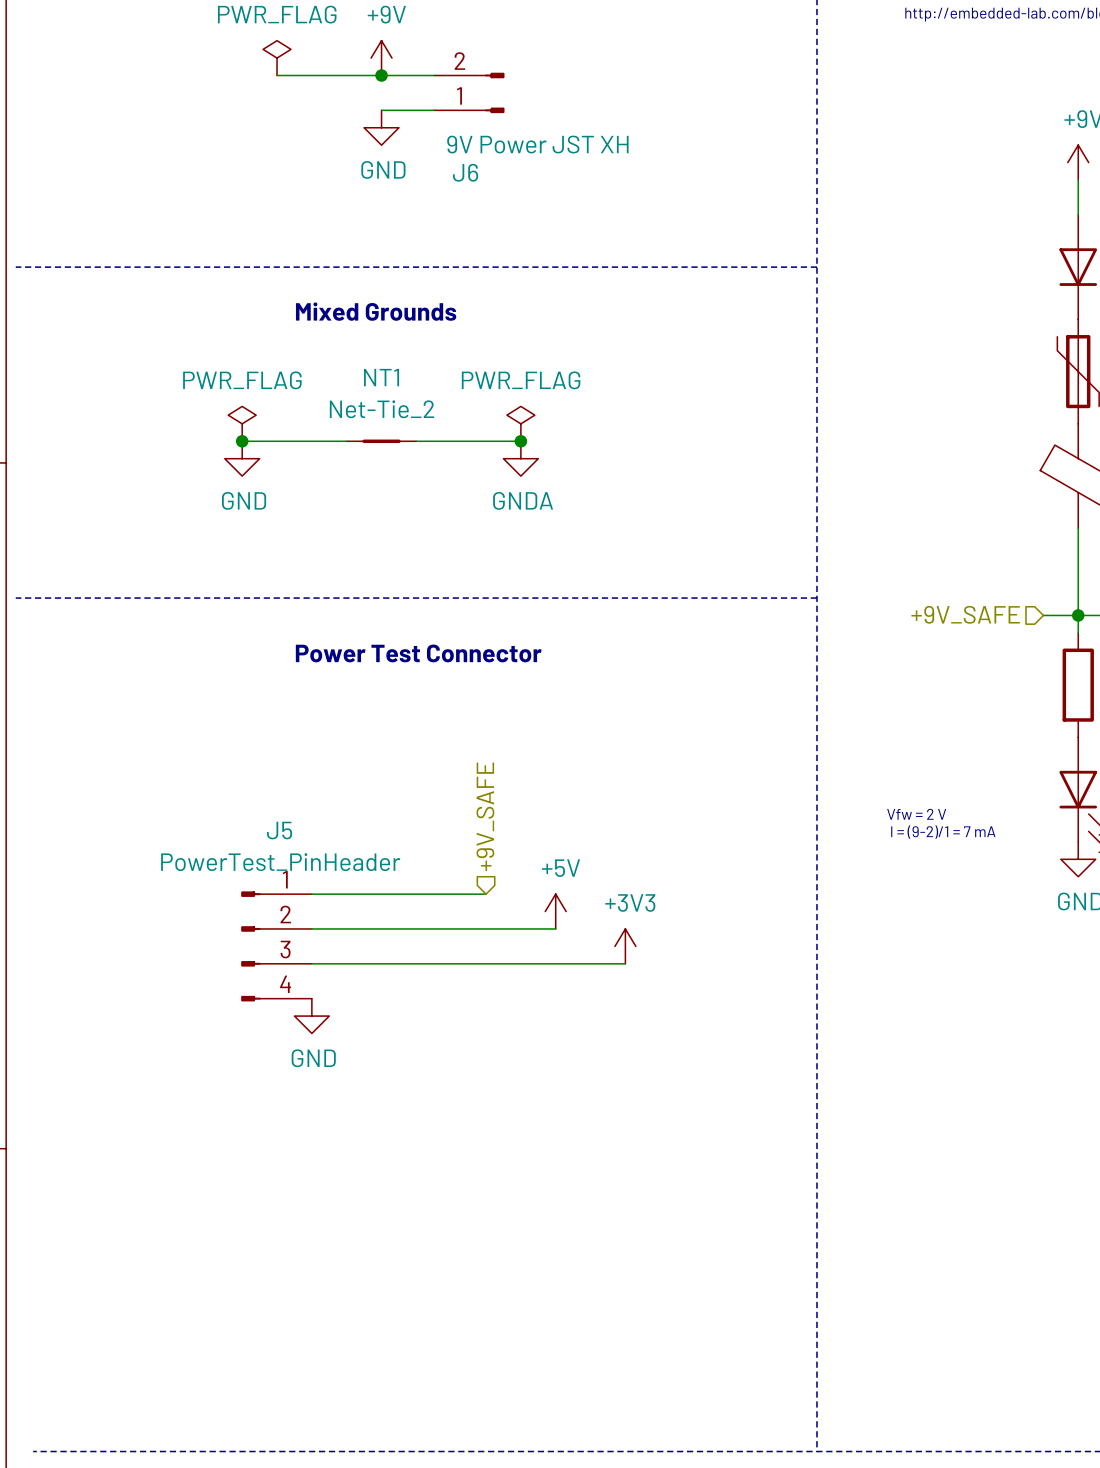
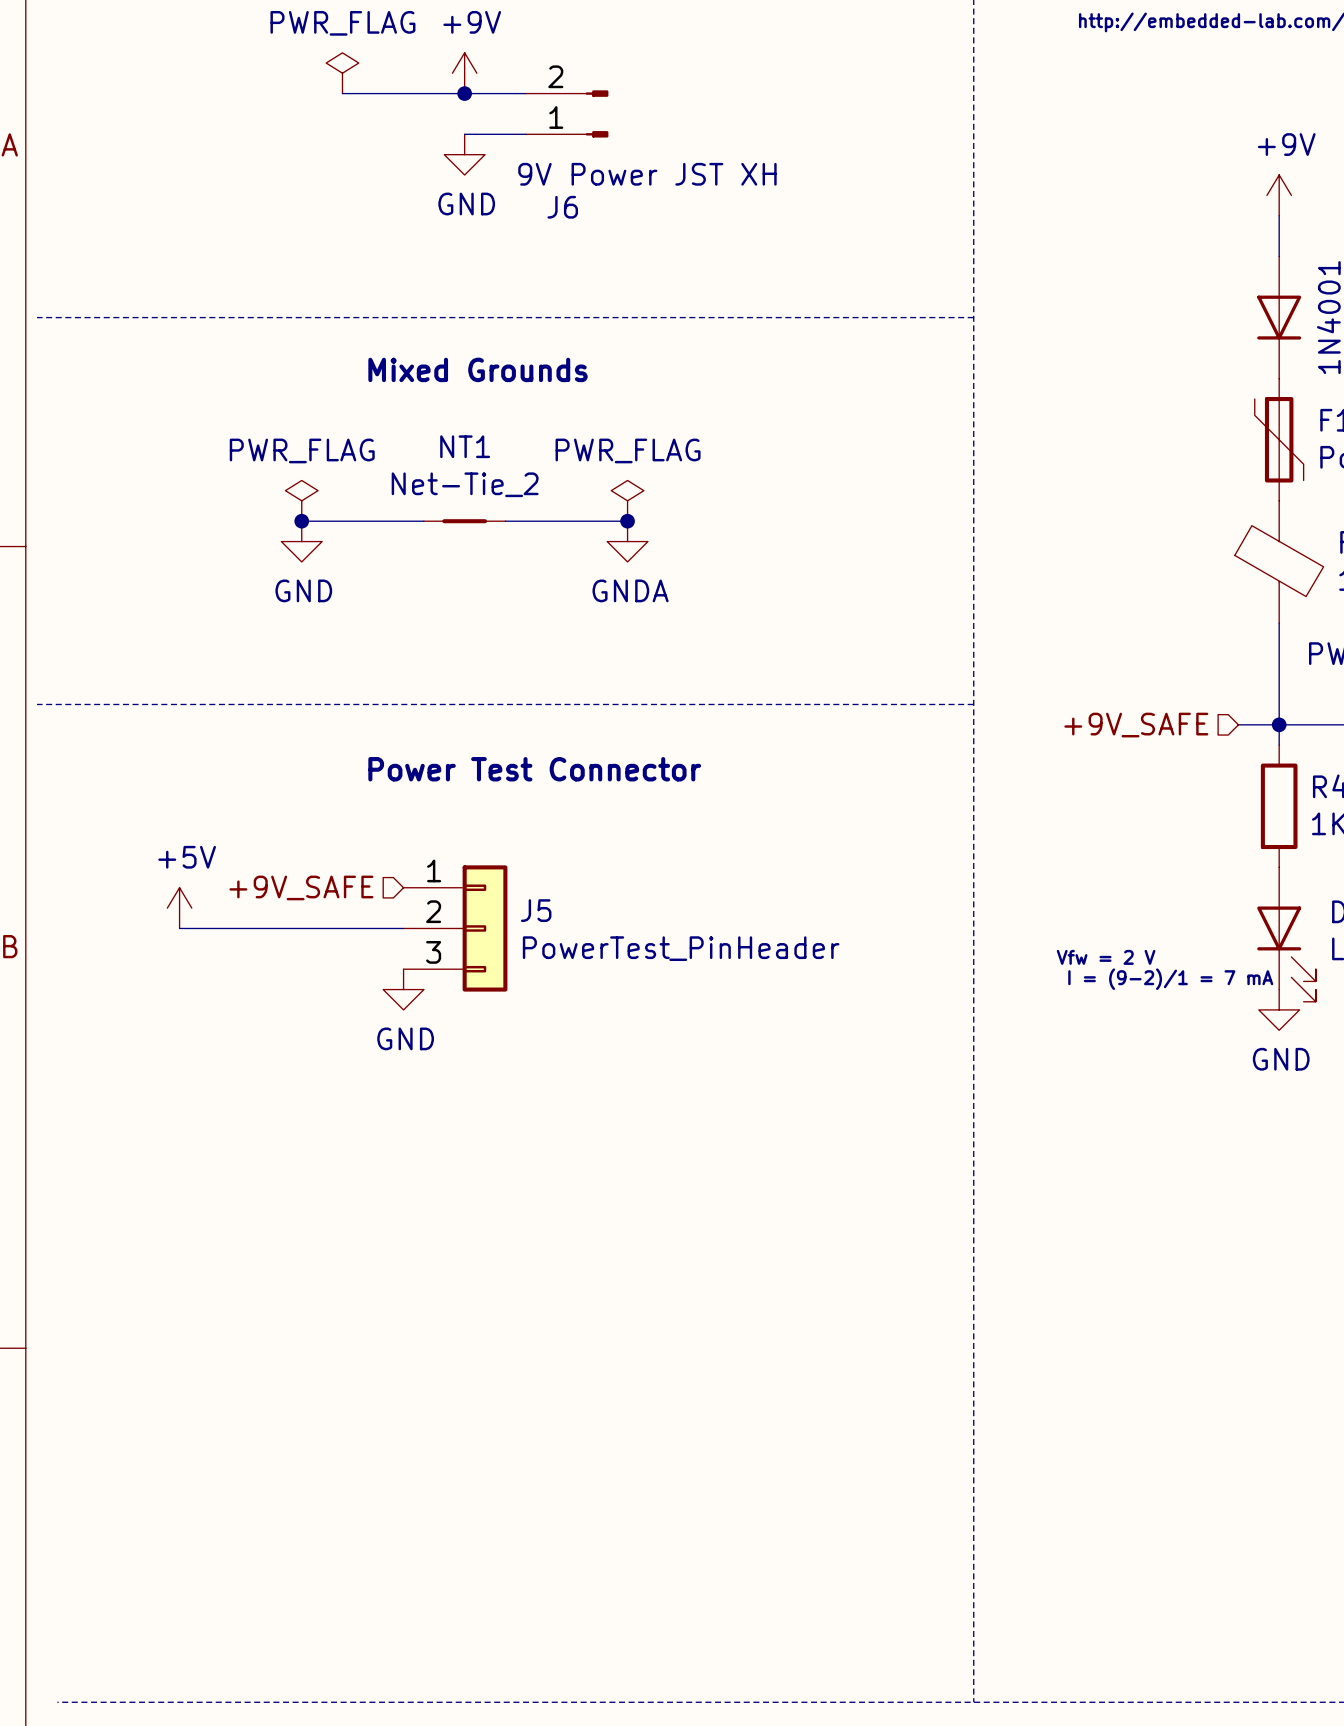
power symbol: none -> +5V (179, 908)
wire: none -> (179, 928) (403, 928)
hierarchical label rotation: 0° (485, 816) -> 90° counterclockwise (301, 887)
hierarchical label position: +9V_SAFE (485, 816) -> +9V_SAFE (301, 887)
J5 name position: J5 (279, 830) -> J5 (536, 910)
J5 value position: PowerTest_PinHeader (280, 862) -> PowerTest_PinHeader (681, 948)
J5 symbol: [241, 891, 312, 1002] -> [403, 865, 508, 992]
wire: (311, 894) (486, 894) -> none
power symbol: +5V (555, 911) -> none
wire: (311, 928) (555, 928) -> none
power symbol: +3V3 (625, 946) -> none
wire: (311, 963) (625, 963) -> none
power symbol position: GND (311, 1016) -> GND (403, 989)

